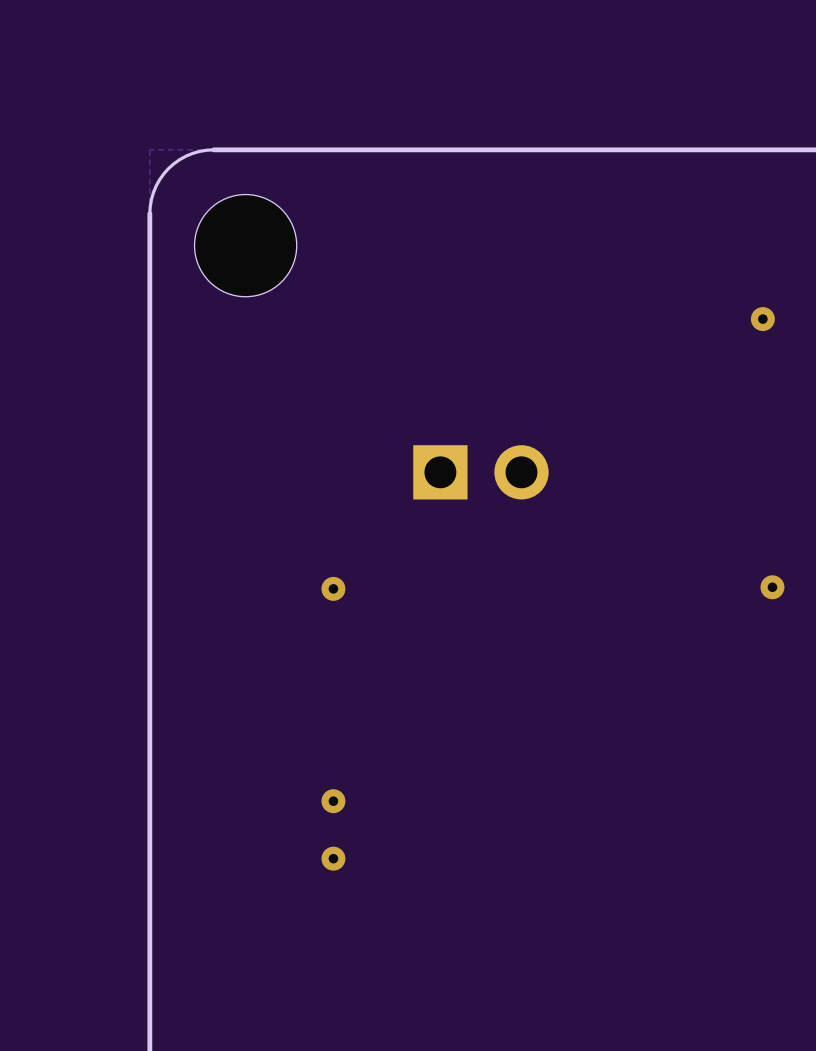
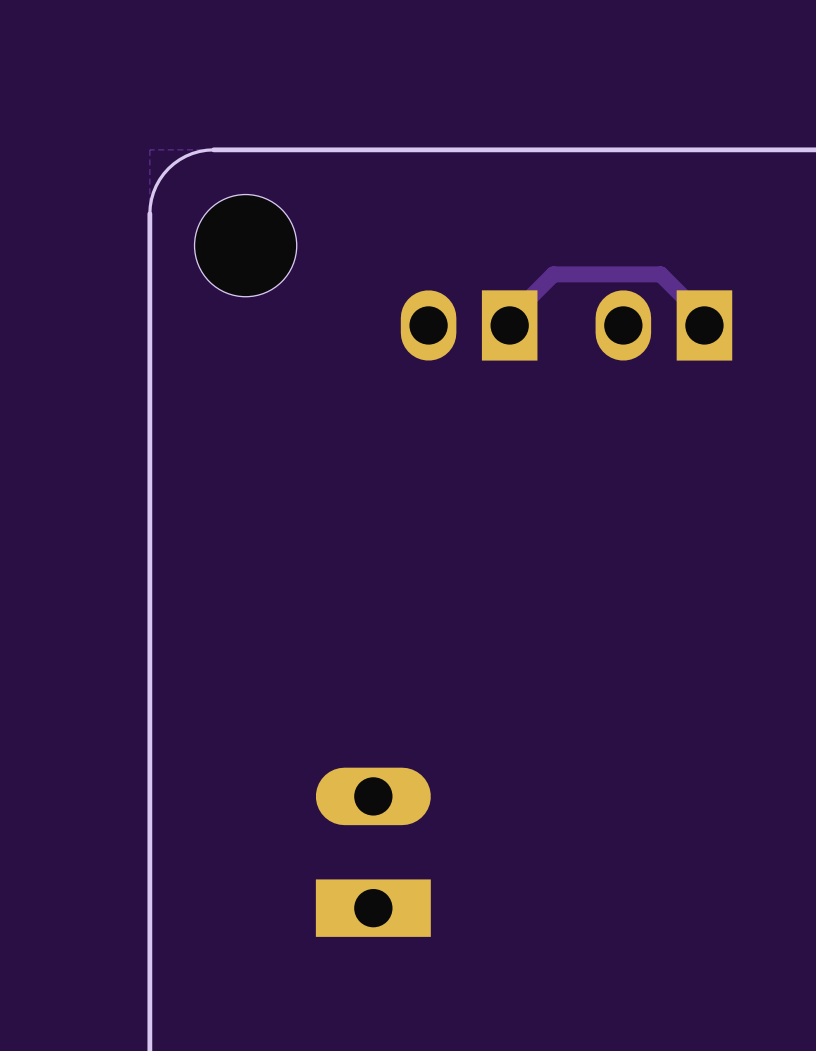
via: (762, 319) -> none
part: none -> (469, 325)
part: none -> (663, 325)
track: none -> (704, 325) (704, 318) (660, 274) (553, 274) (509, 318) (509, 325)
part: (480, 472) -> none
via: (772, 587) -> none
via: (333, 588) -> none
via: (333, 801) -> none
part: none -> (373, 852)
via: (333, 858) -> none

